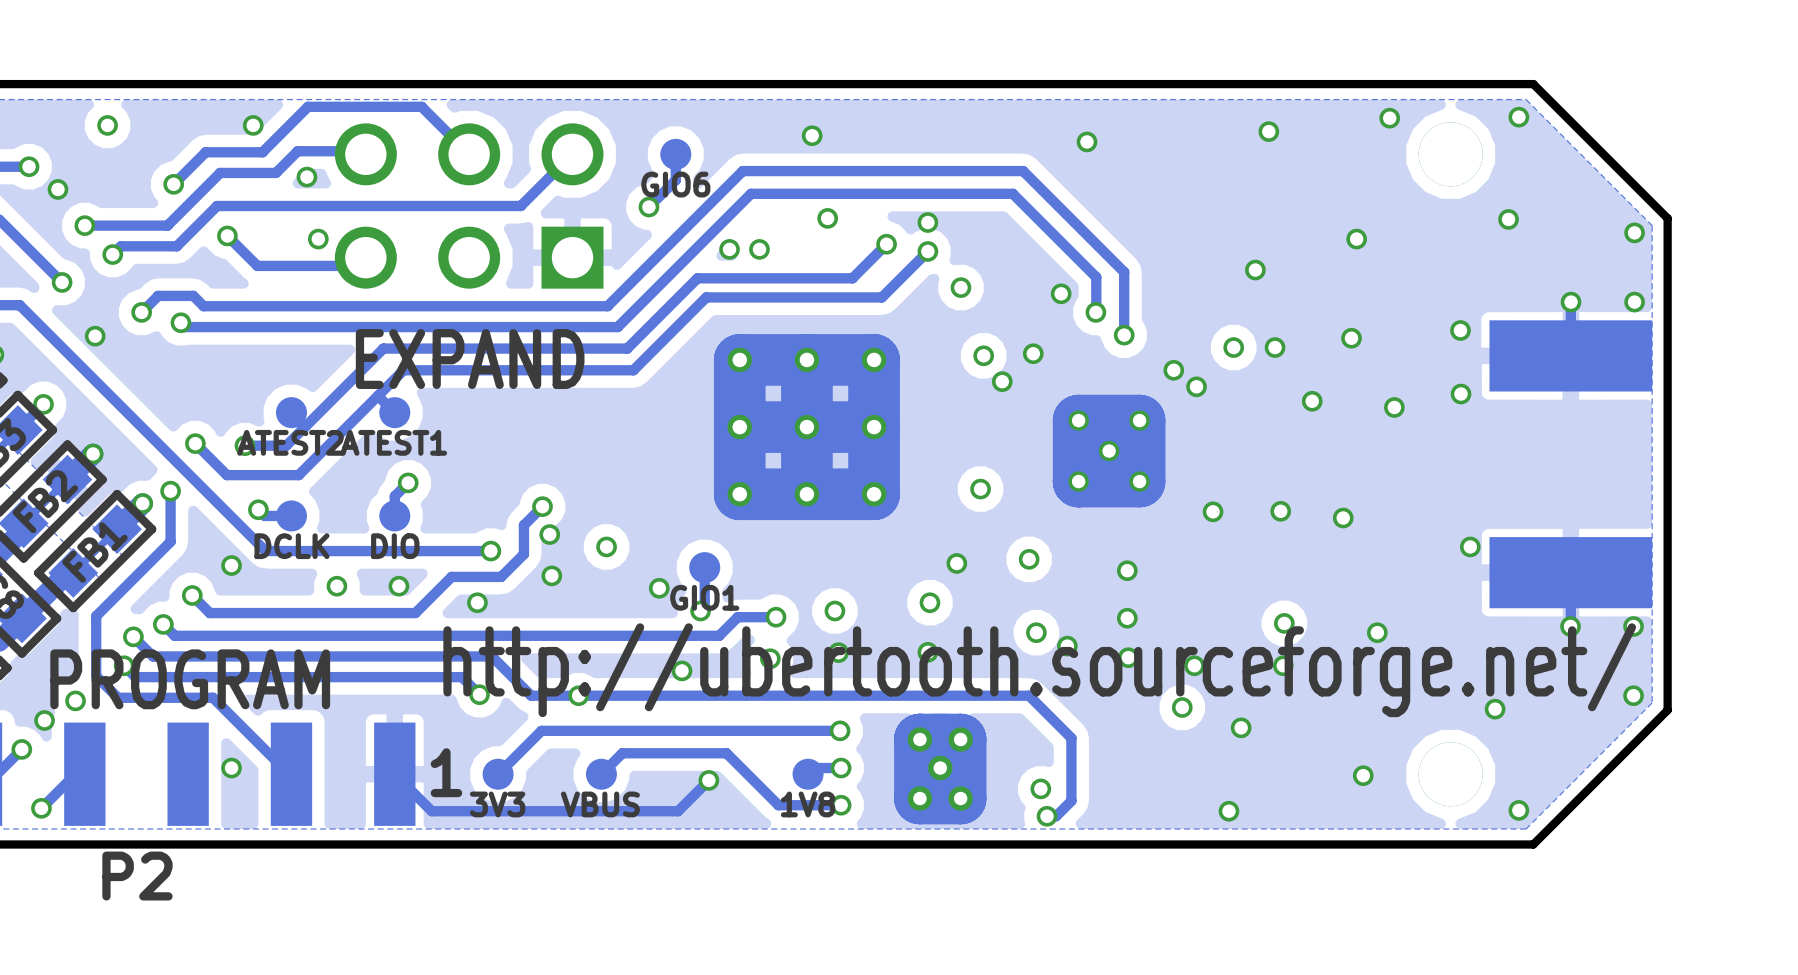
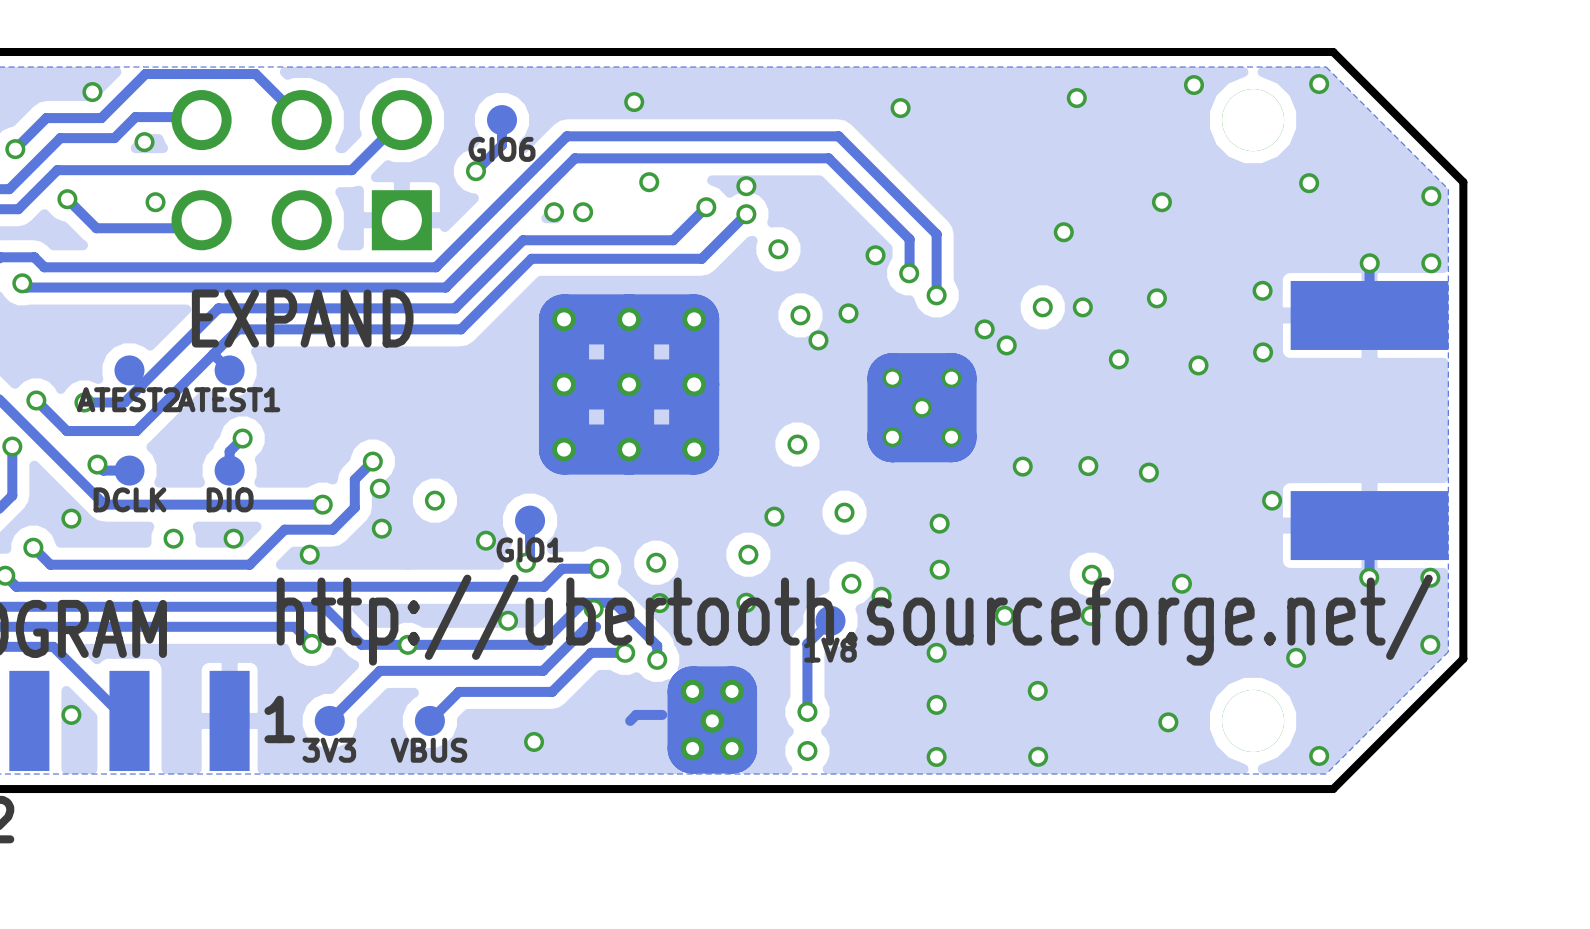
via: (1128, 657) -> none
track: none -> (830, 620) (807, 643) (807, 711)
track: (716, 695) (1029, 695) (1071, 738) (1071, 800) (1056, 816) (1047, 816) -> (541, 644) (583, 602) (614, 602) (657, 645) (657, 659)
via: none -> (625, 652)
via: none -> (936, 652)
via: (1182, 707) -> none
via position: (1241, 727) -> (1037, 690)
track: (840, 730) (541, 730) -> (596, 626) (587, 626) (543, 670) (379, 670) (371, 678)
via position: (840, 730) -> (657, 659)
track: (919, 739) (919, 798) (960, 798) (960, 739) (919, 739) -> none
track: none -> (732, 691) (692, 691) (692, 748) (732, 748) (732, 691)
track: (622, 753) (726, 753) (778, 805) (841, 805) -> (450, 700) (458, 691) (552, 691) (591, 652) (625, 652)
via: none -> (936, 704)
via: none -> (807, 711)
via: (841, 768) -> none
part rotation: 0° (940, 769) -> 180° (712, 719)
track: (394, 774) (431, 811) (678, 811) (708, 780) -> none
part position: (808, 774) -> (830, 620)
via position: (708, 780) -> (534, 741)
via: (1040, 788) -> none
via: (841, 805) -> none
via: none -> (807, 750)
via: none -> (936, 756)
via: (1047, 816) -> none

